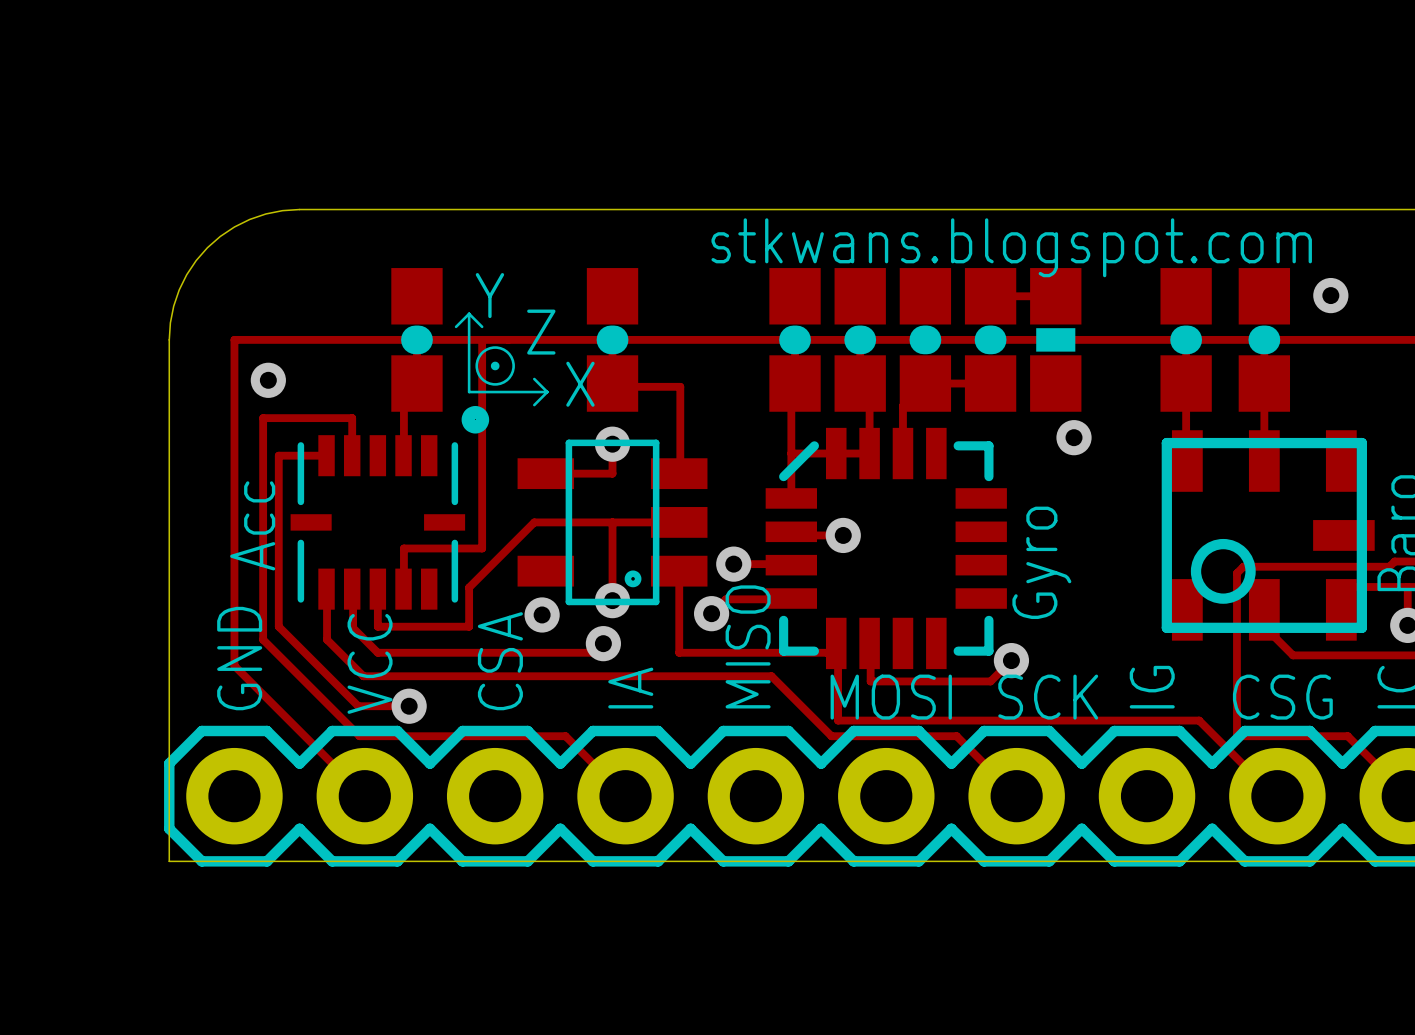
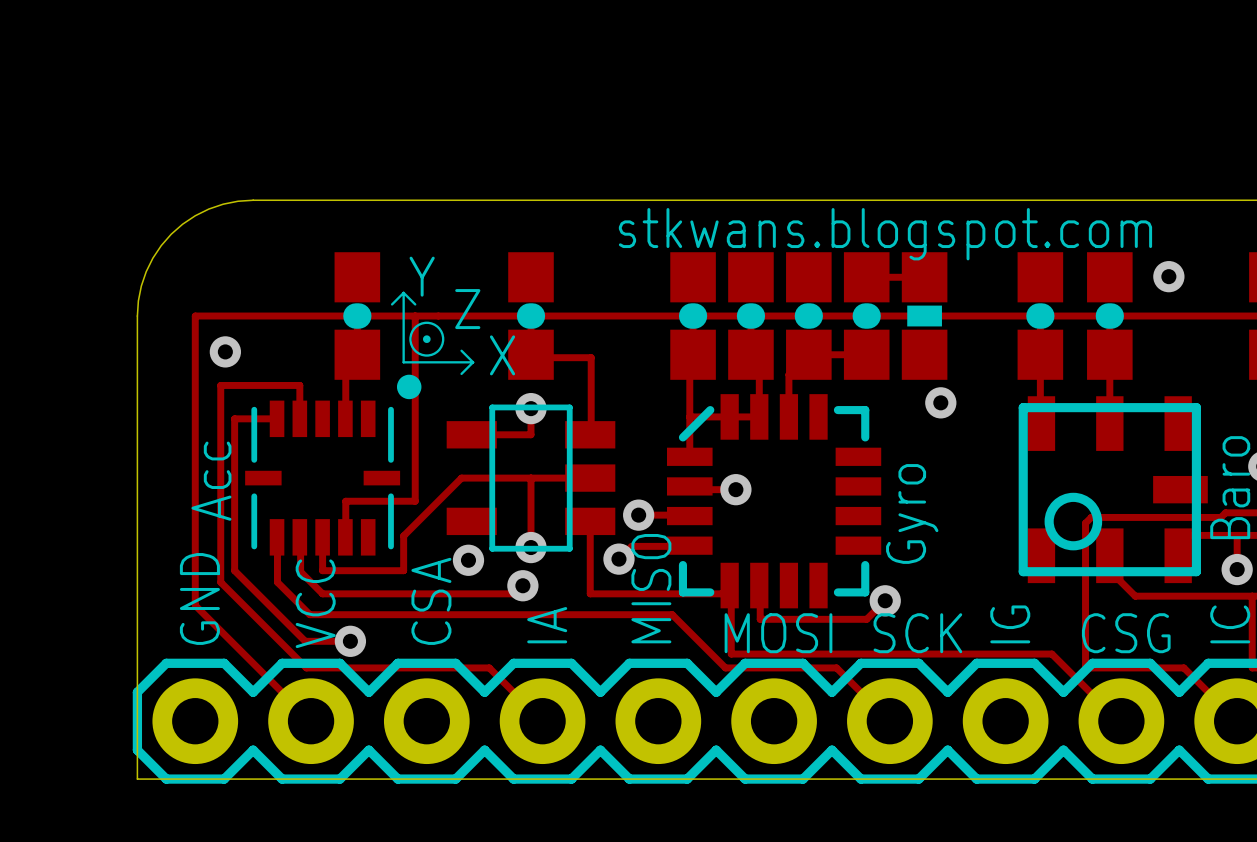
part footprint: [517, 439, 708, 606] -> [446, 404, 616, 552]

